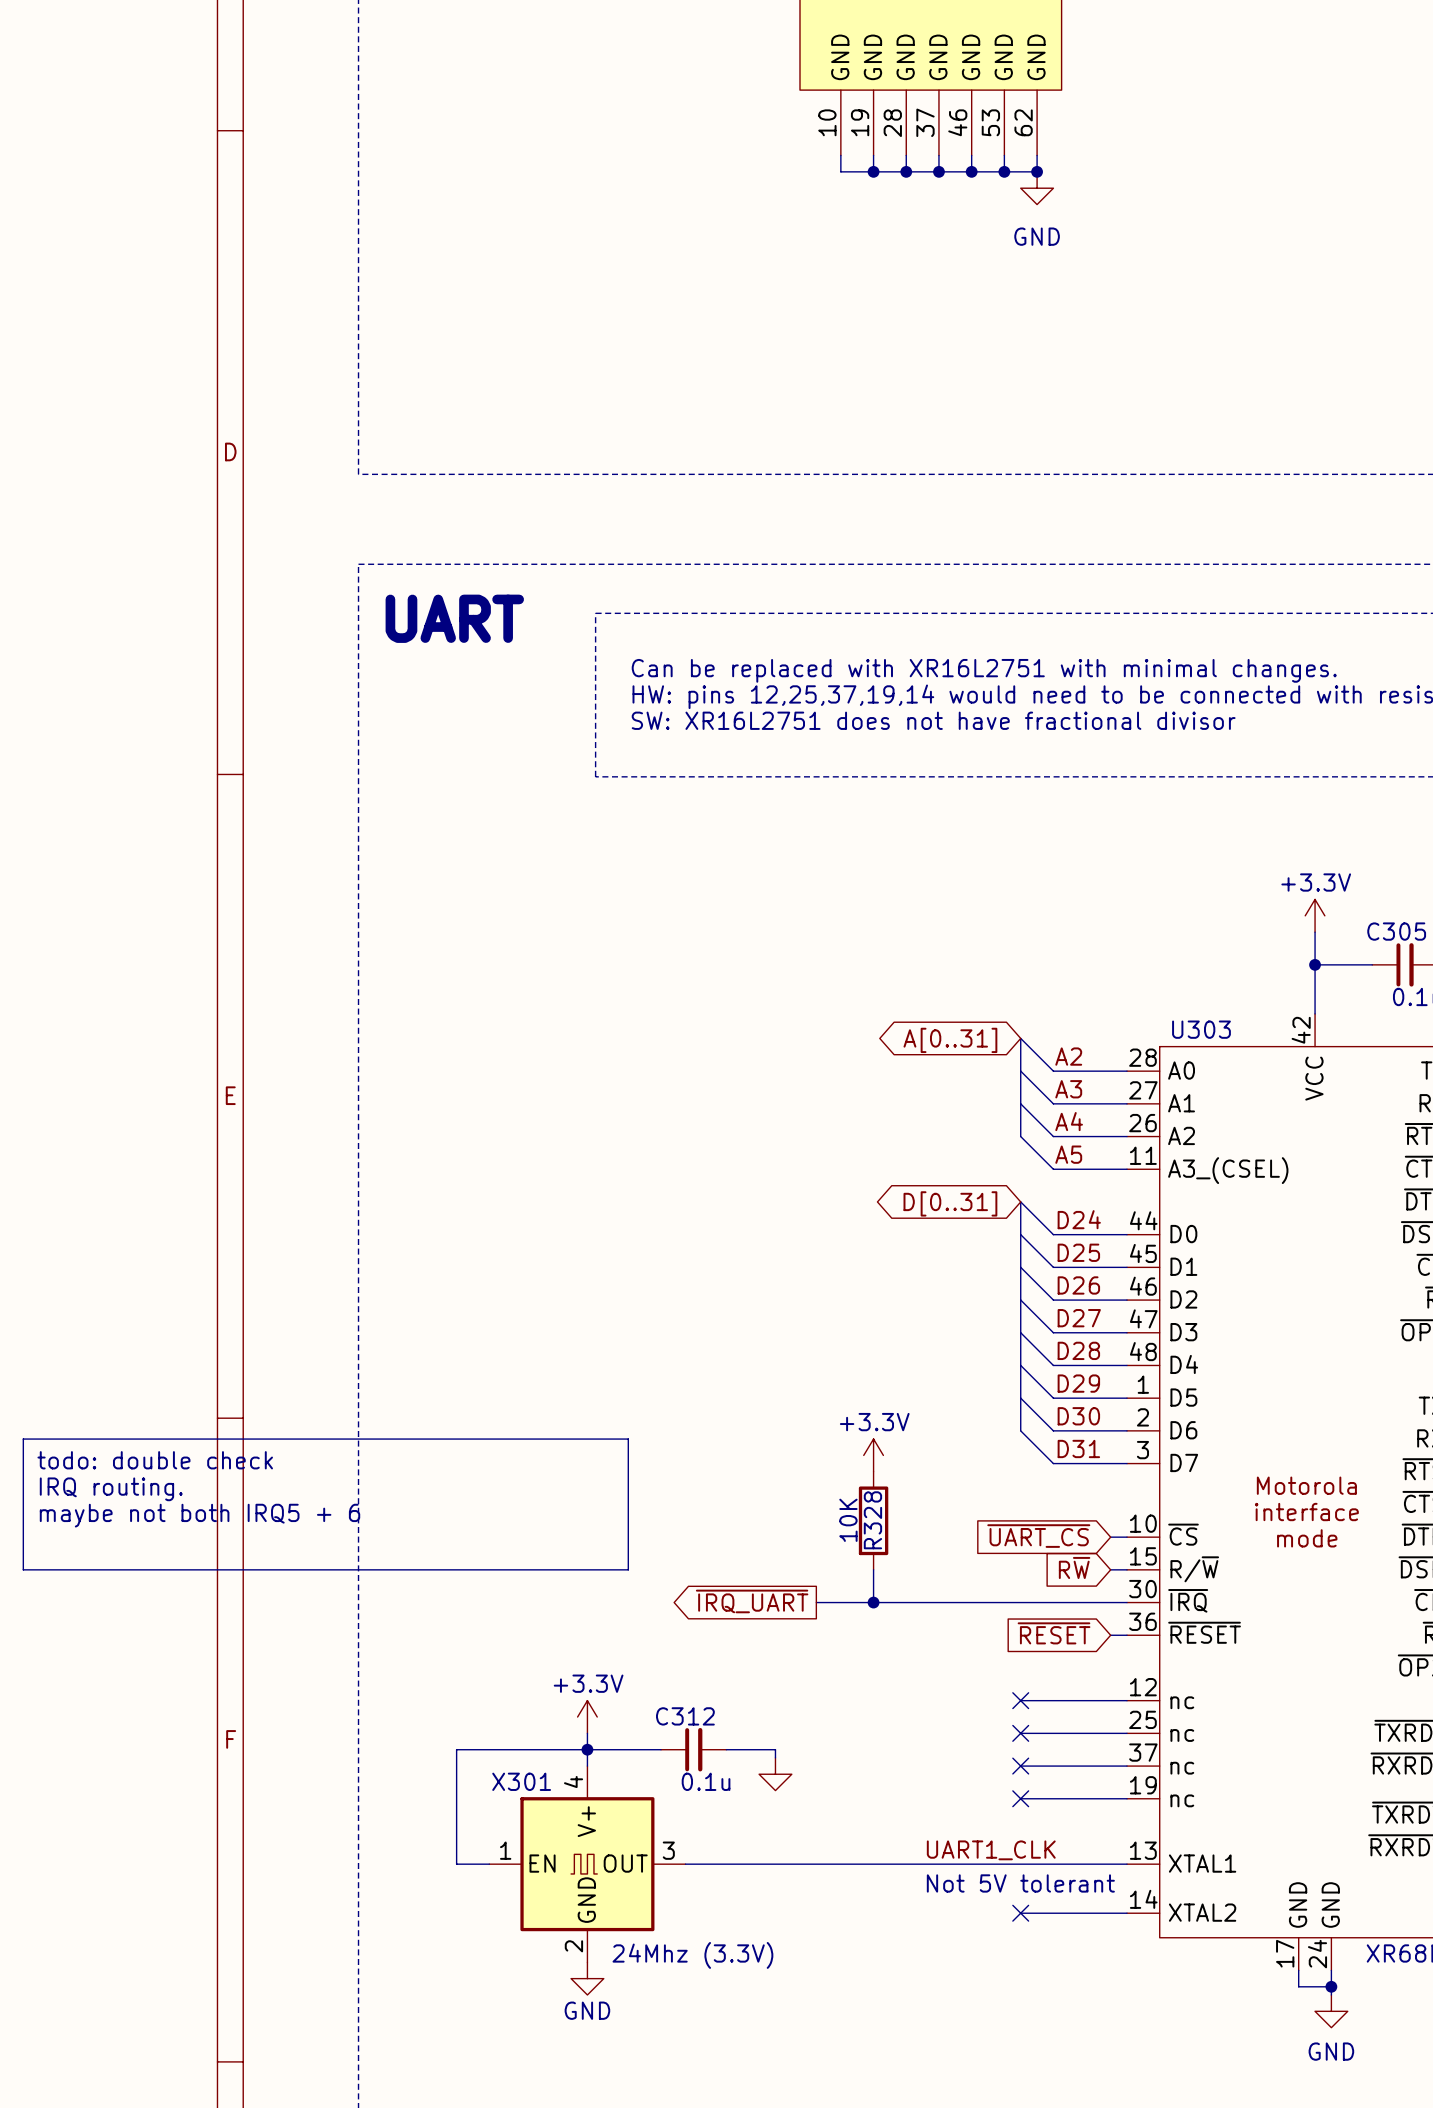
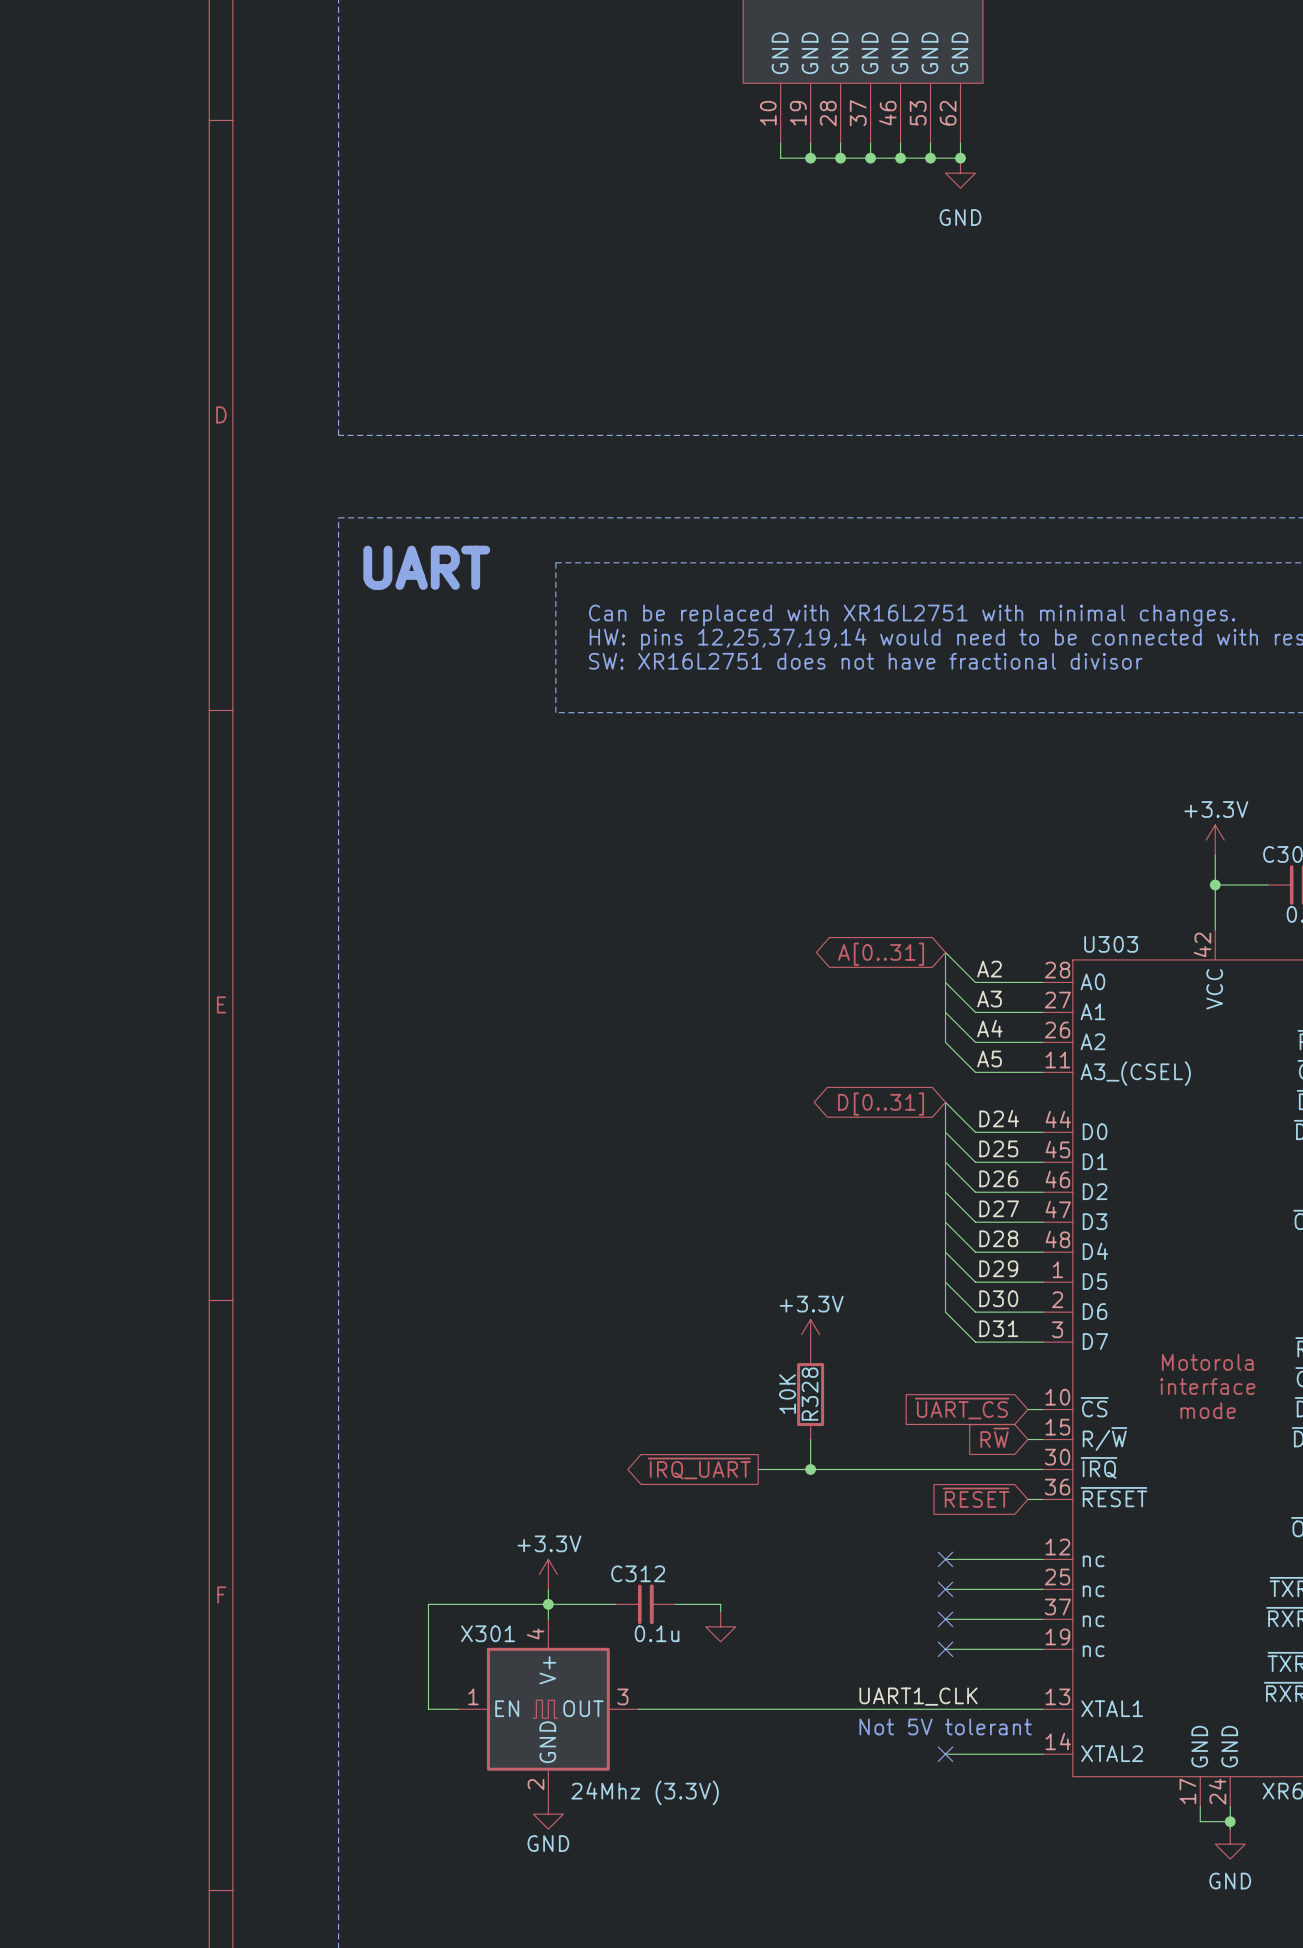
line: (23, 1439) (628, 1439) (628, 1569) (23, 1569) (23, 1439) -> none
text: todo: double check (155, 1460) -> none
text: IRQ routing. (111, 1489) -> none
text: maybe not both IRQ5 + 6 (200, 1515) -> none

